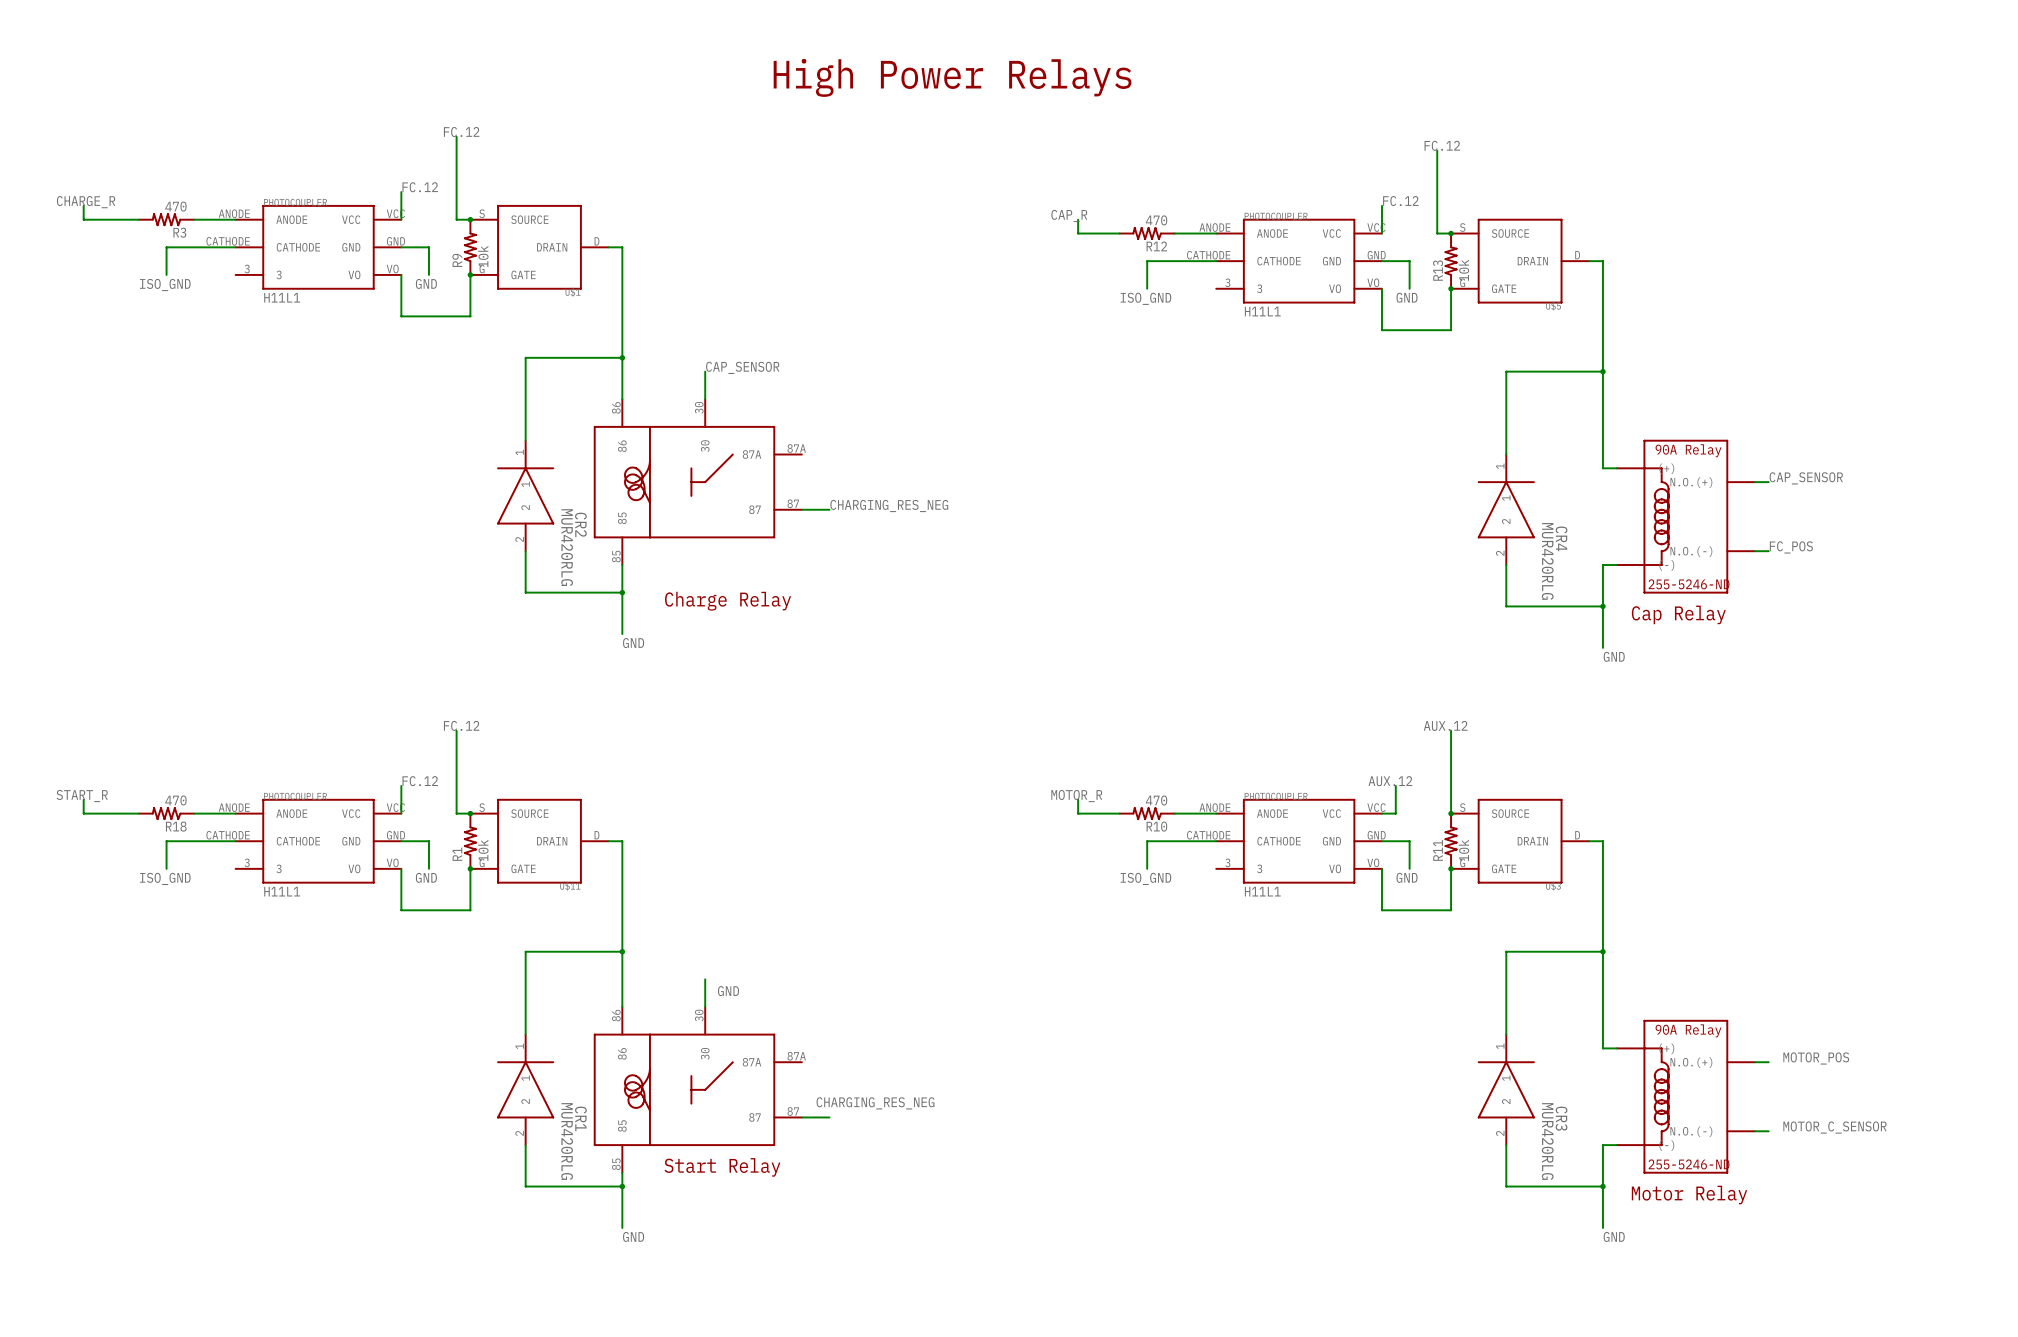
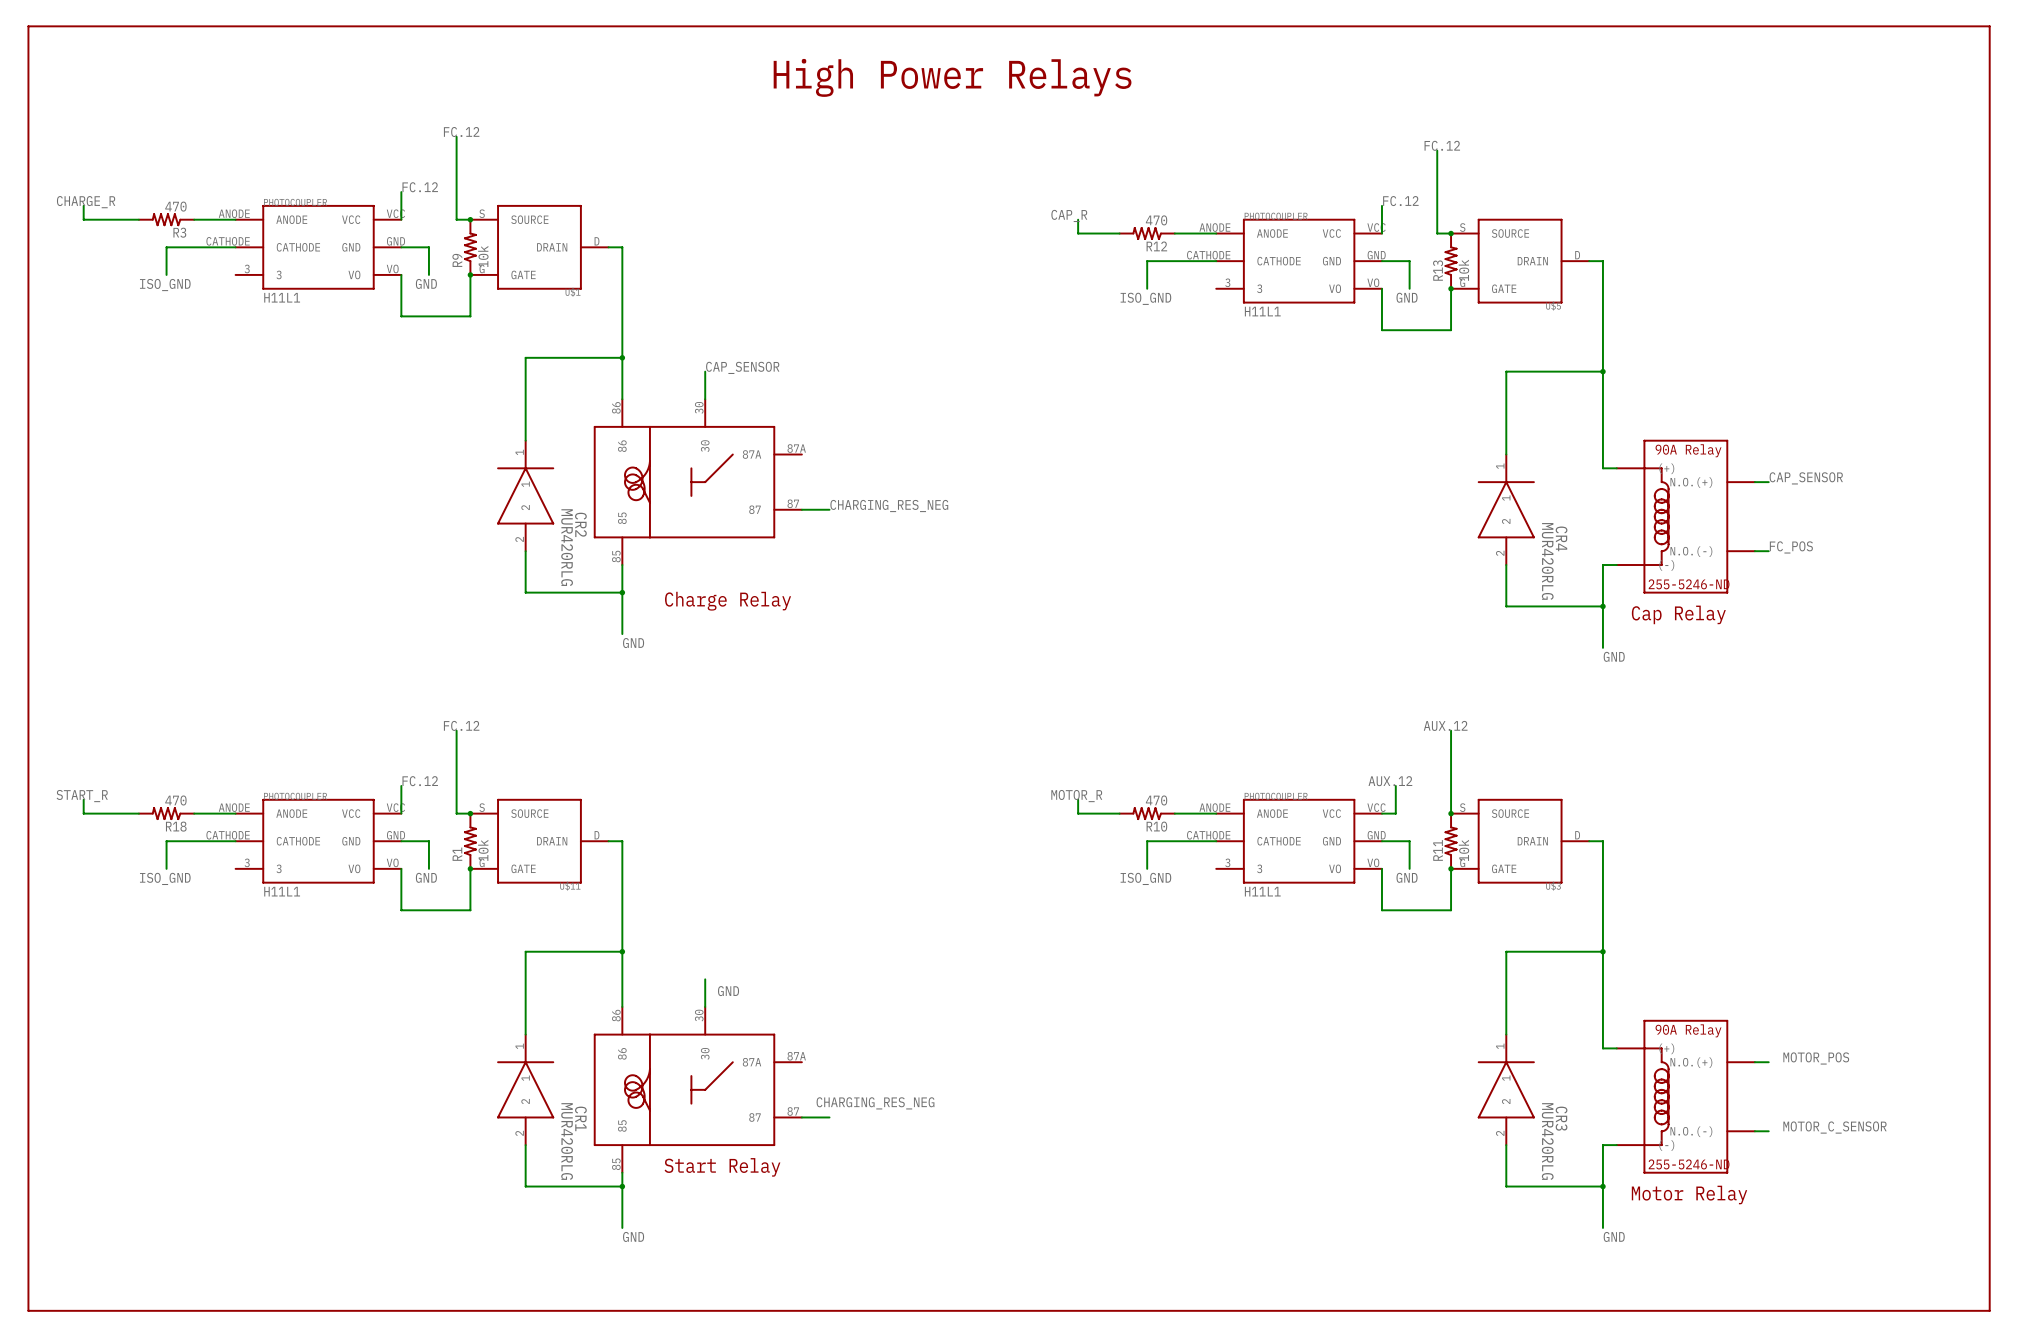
line: none -> (28, 26) (28, 1310) (1989, 1310) (1989, 26) (28, 26)

